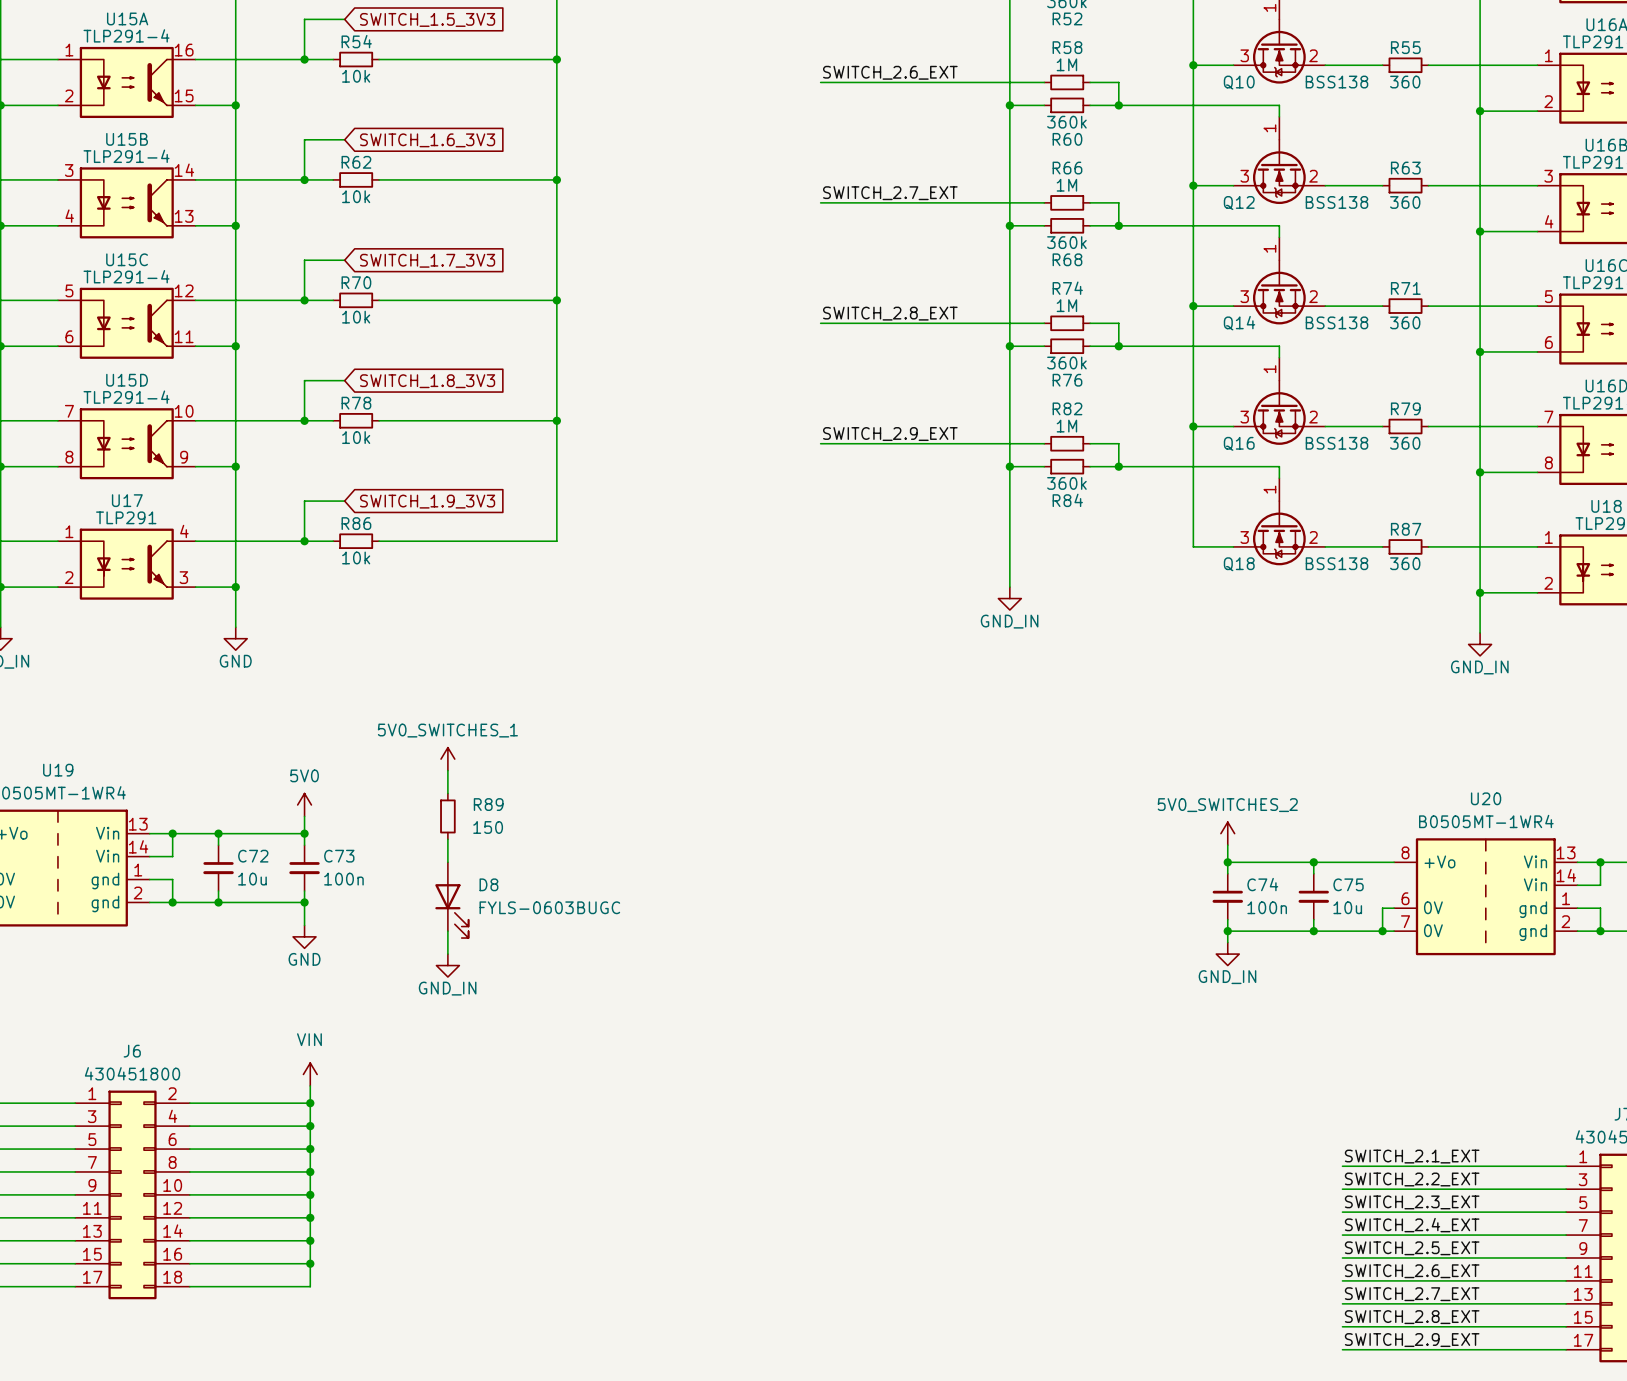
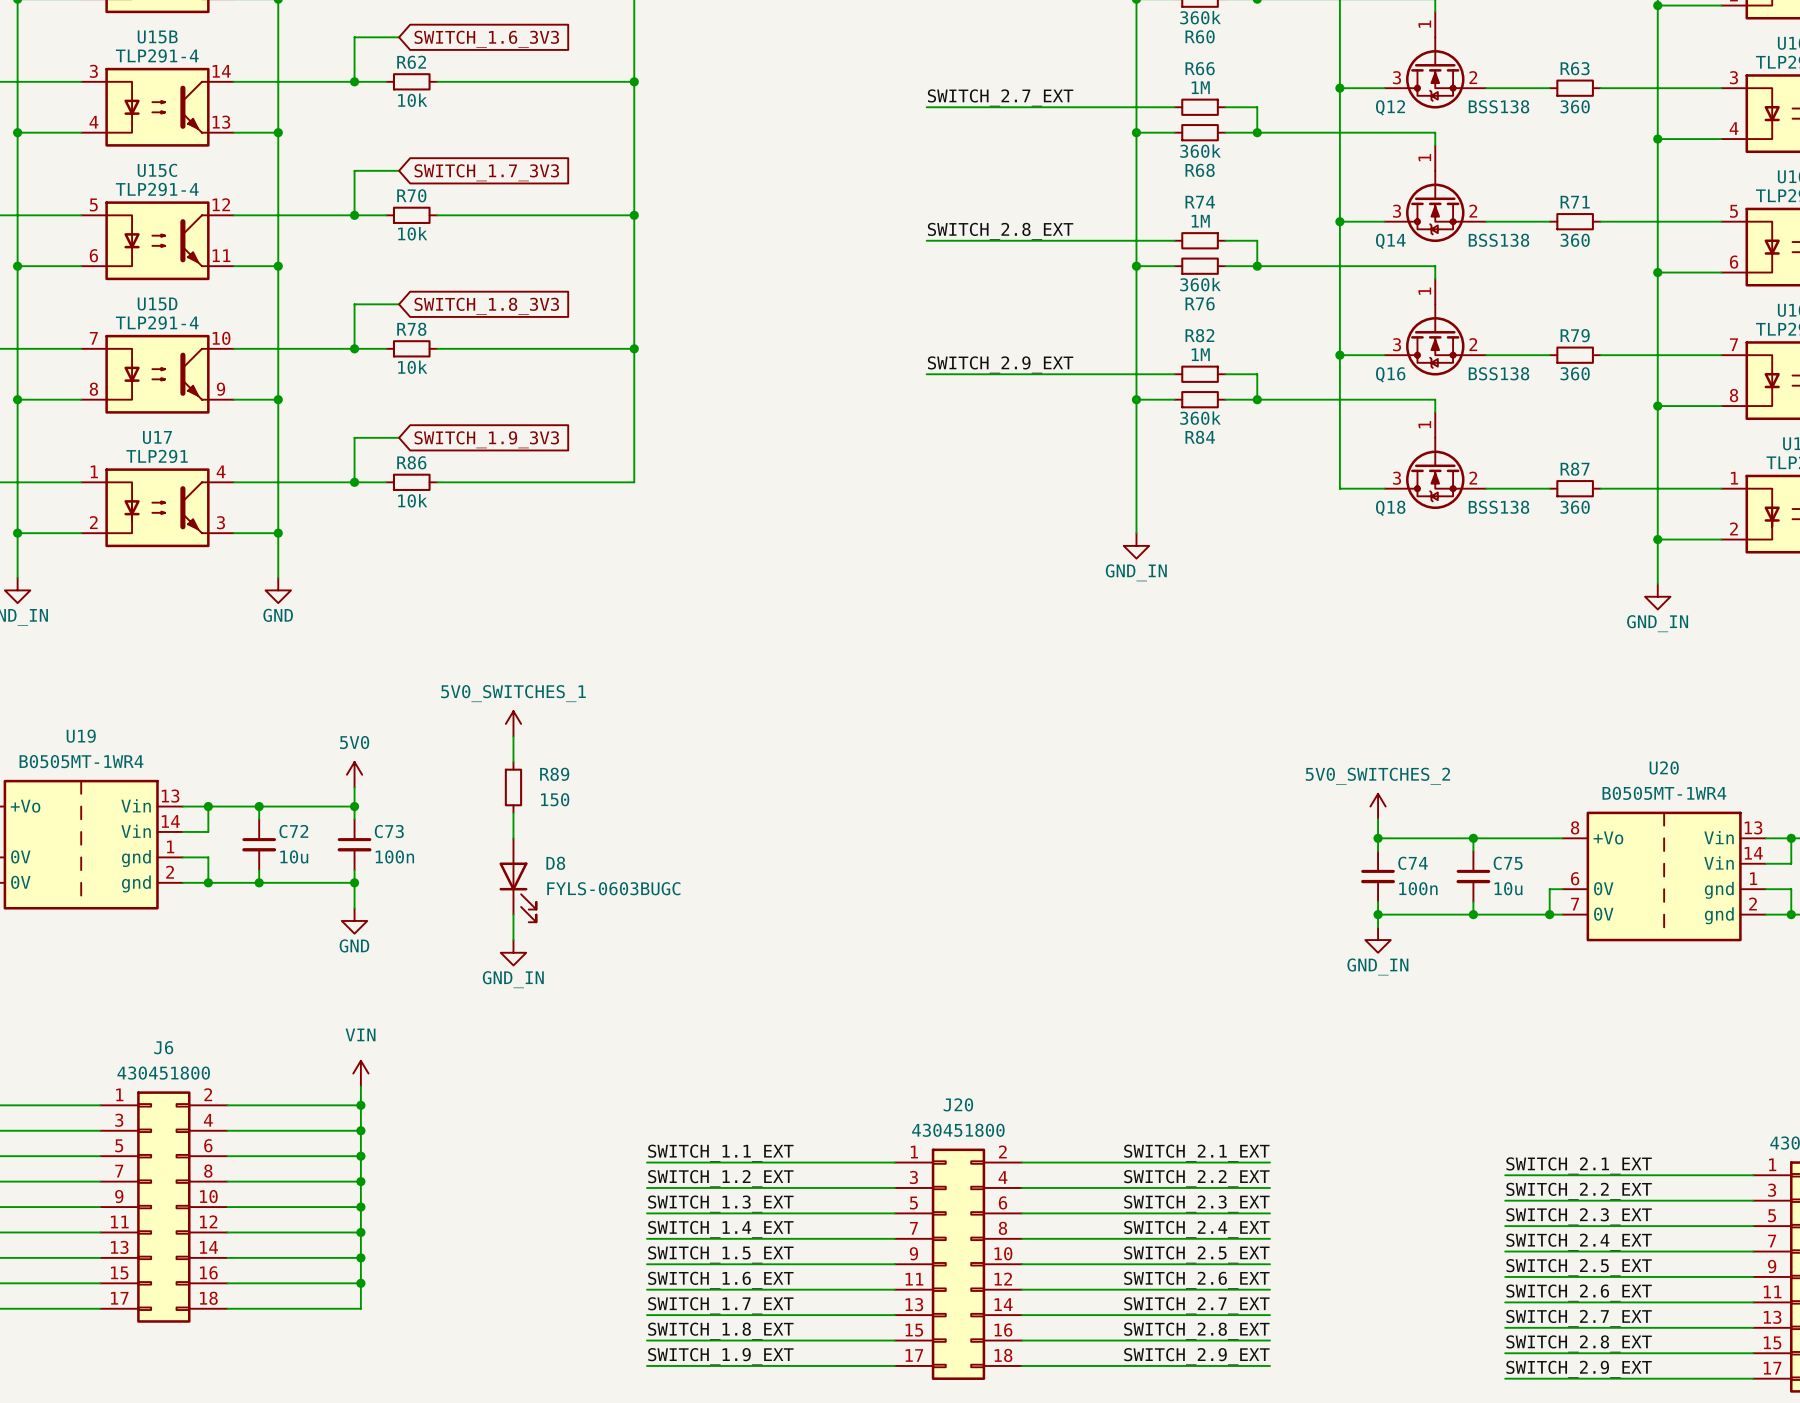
label: none -> SWITCH_1.1_EXT (720, 1153)
label: none -> SWITCH_2.1_EXT (1196, 1153)
wire: none -> (646, 1162) (894, 1162)
wire: none -> (1022, 1162) (1269, 1162)
label: none -> SWITCH_1.2_EXT (720, 1178)
label: none -> SWITCH_2.2_EXT (1196, 1178)
wire: none -> (646, 1187) (894, 1187)
wire: none -> (1022, 1187) (1269, 1187)
label: none -> SWITCH_1.3_EXT (720, 1204)
label: none -> SWITCH_2.3_EXT (1196, 1204)
wire: none -> (646, 1213) (894, 1213)
wire: none -> (1022, 1213) (1269, 1213)
label: none -> SWITCH_1.4_EXT (720, 1229)
label: none -> SWITCH_2.4_EXT (1196, 1229)
wire: none -> (646, 1238) (894, 1238)
wire: none -> (1022, 1238) (1269, 1238)
label: none -> SWITCH_1.5_EXT (720, 1254)
label: none -> SWITCH_2.5_EXT (1196, 1254)
wire: none -> (646, 1264) (894, 1264)
J20: none -> 430451800 (958, 1264)
wire: none -> (1022, 1264) (1269, 1264)
label: none -> SWITCH_1.6_EXT (720, 1280)
label: none -> SWITCH_2.6_EXT (1196, 1280)
wire: none -> (646, 1289) (894, 1289)
wire: none -> (1022, 1289) (1269, 1289)
label: none -> SWITCH_1.7_EXT (720, 1305)
label: none -> SWITCH_2.7_EXT (1196, 1305)
wire: none -> (646, 1315) (894, 1315)
wire: none -> (1022, 1315) (1269, 1315)
label: none -> SWITCH_1.8_EXT (720, 1331)
label: none -> SWITCH_2.8_EXT (1196, 1331)
wire: none -> (646, 1340) (894, 1340)
wire: none -> (1022, 1340) (1269, 1340)
label: none -> SWITCH_1.9_EXT (720, 1356)
label: none -> SWITCH_2.9_EXT (1196, 1356)
wire: none -> (646, 1365) (894, 1365)
wire: none -> (1022, 1365) (1269, 1365)

